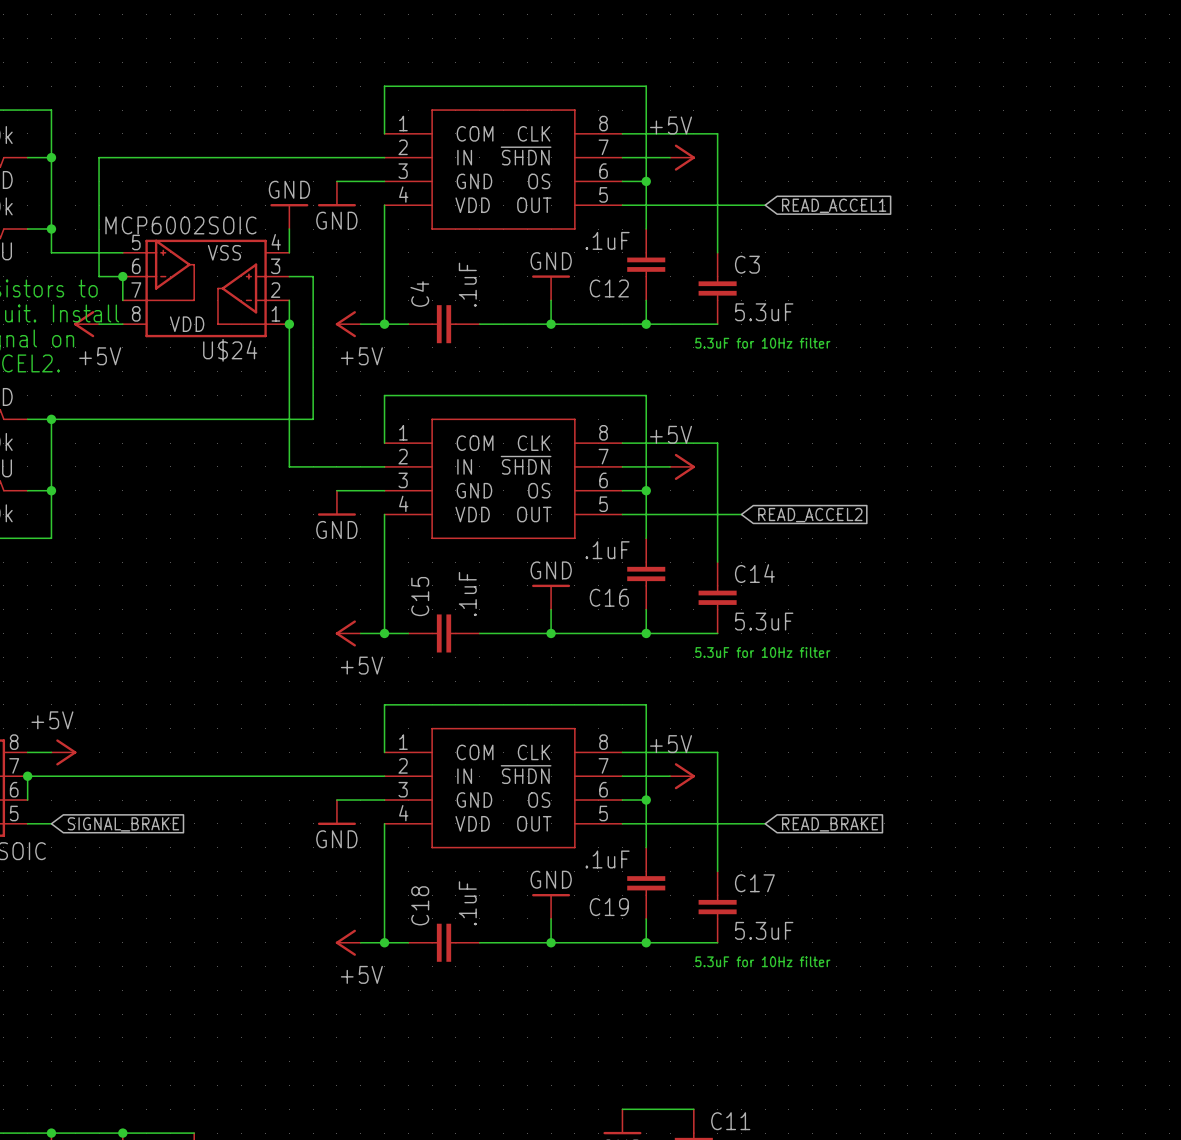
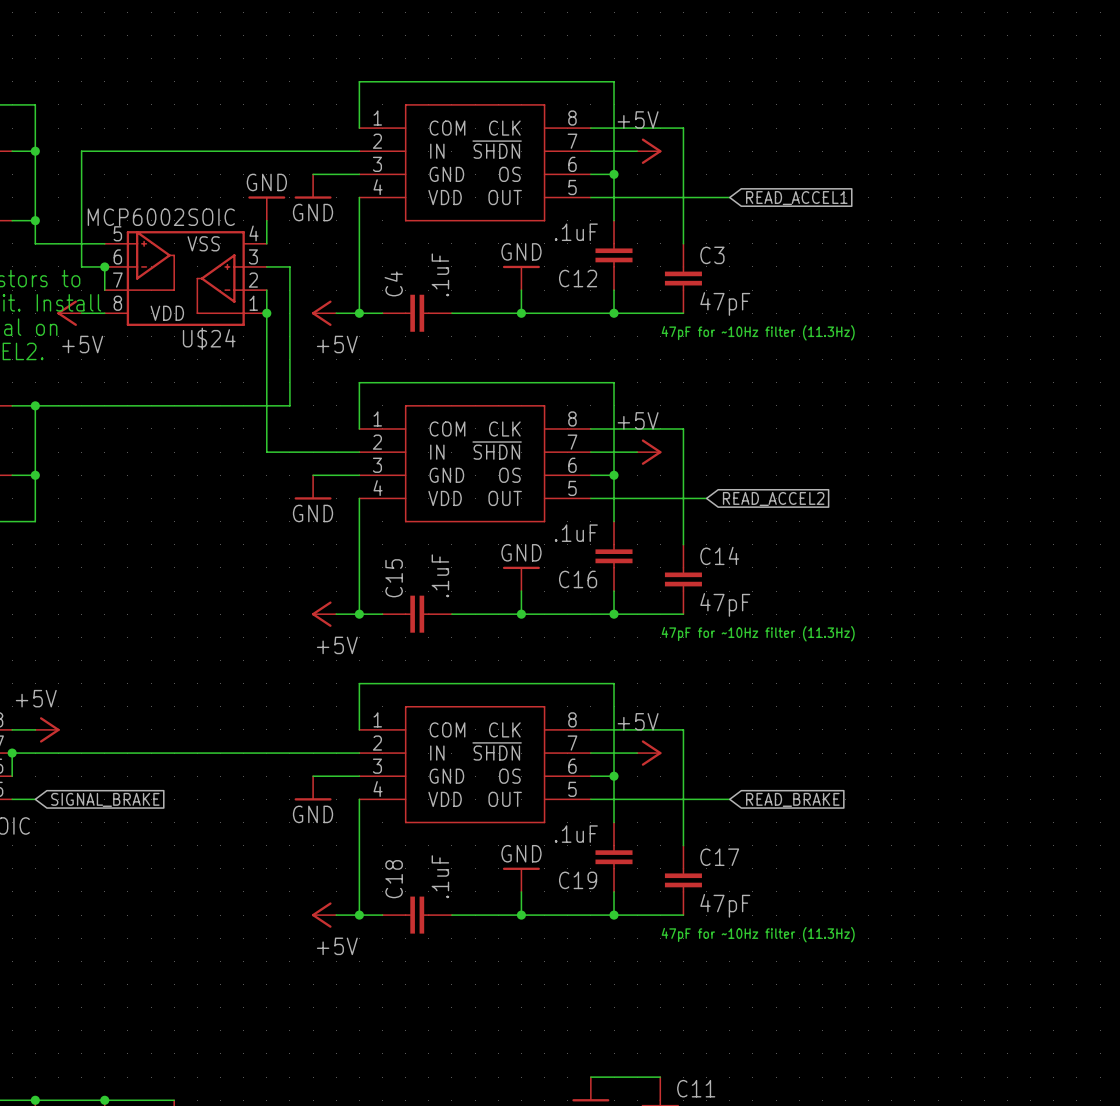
C3 value: 5.3uF (764, 312) -> 47pF (725, 304)
text: 5.3uF for 10Hz filter (762, 343) -> 47pF for ~10Hz filter (11.3Hz) (758, 332)
C14 value: 5.3uF (764, 621) -> 47pF (725, 604)
text: 5.3uF for 10Hz filter (762, 652) -> 47pF for ~10Hz filter (11.3Hz) (758, 633)
C17 value: 5.3uF (764, 930) -> 47pF (725, 905)
text: 5.3uF for 10Hz filter (762, 961) -> 47pF for ~10Hz filter (11.3Hz) (758, 934)

